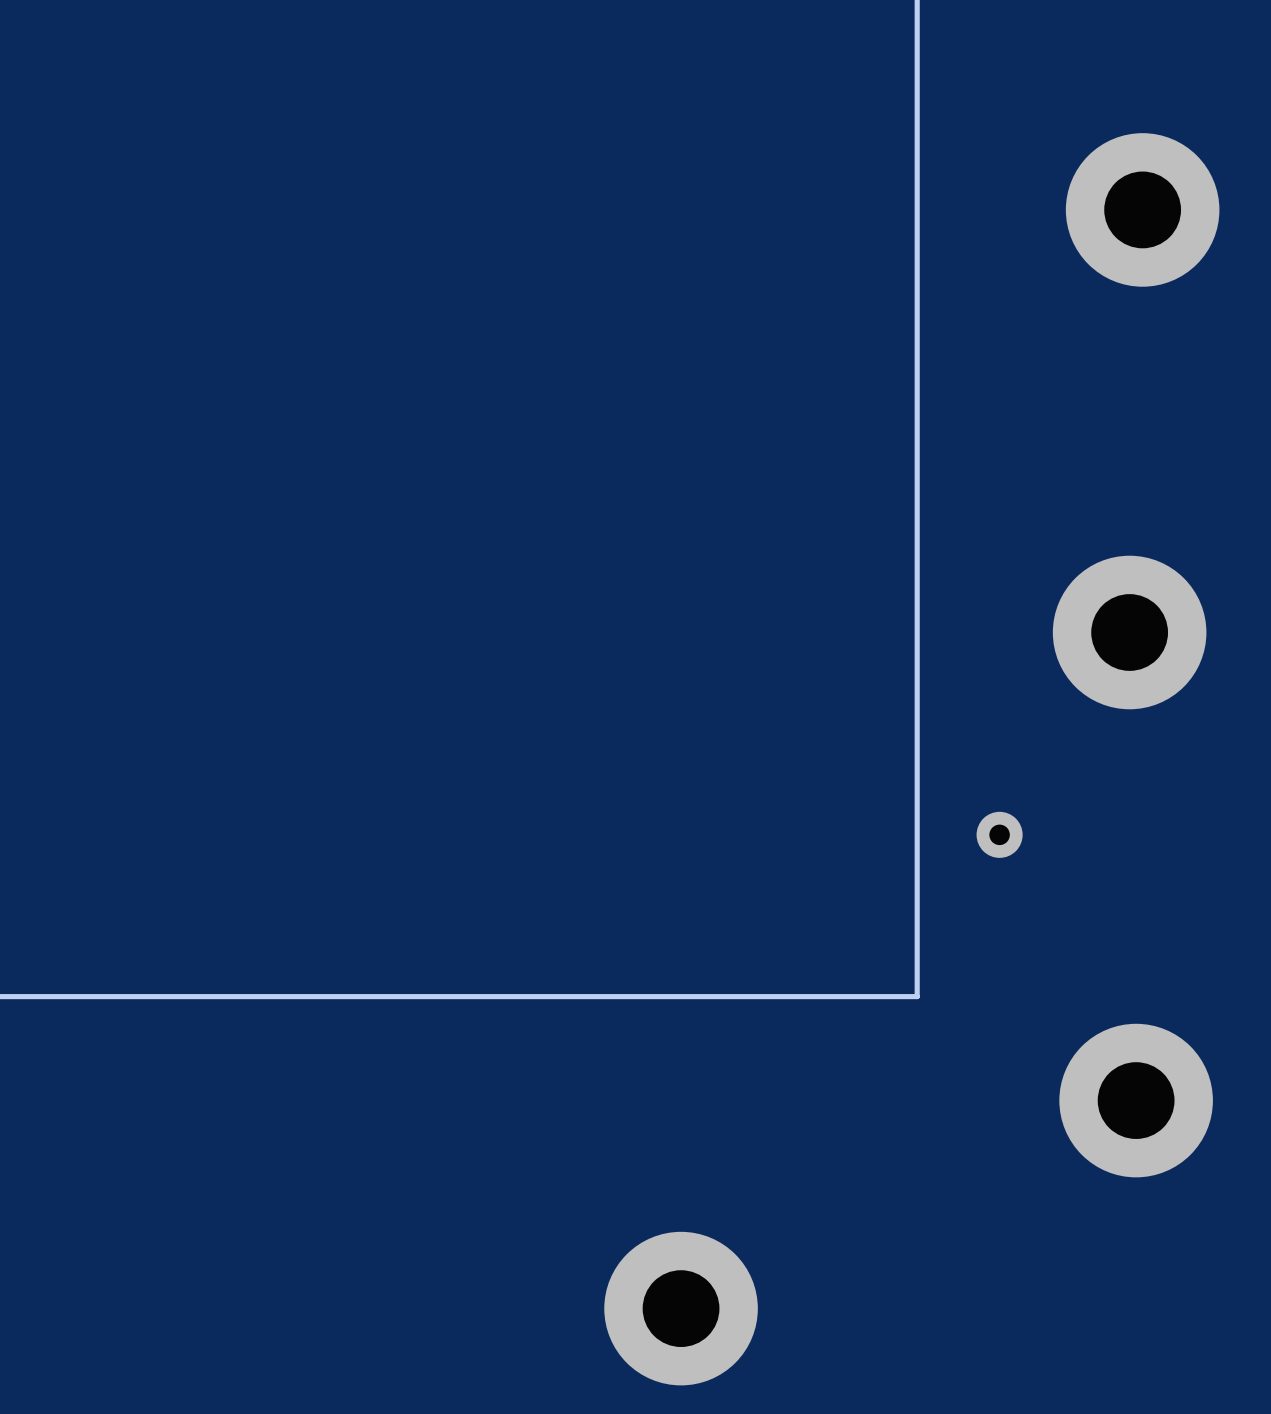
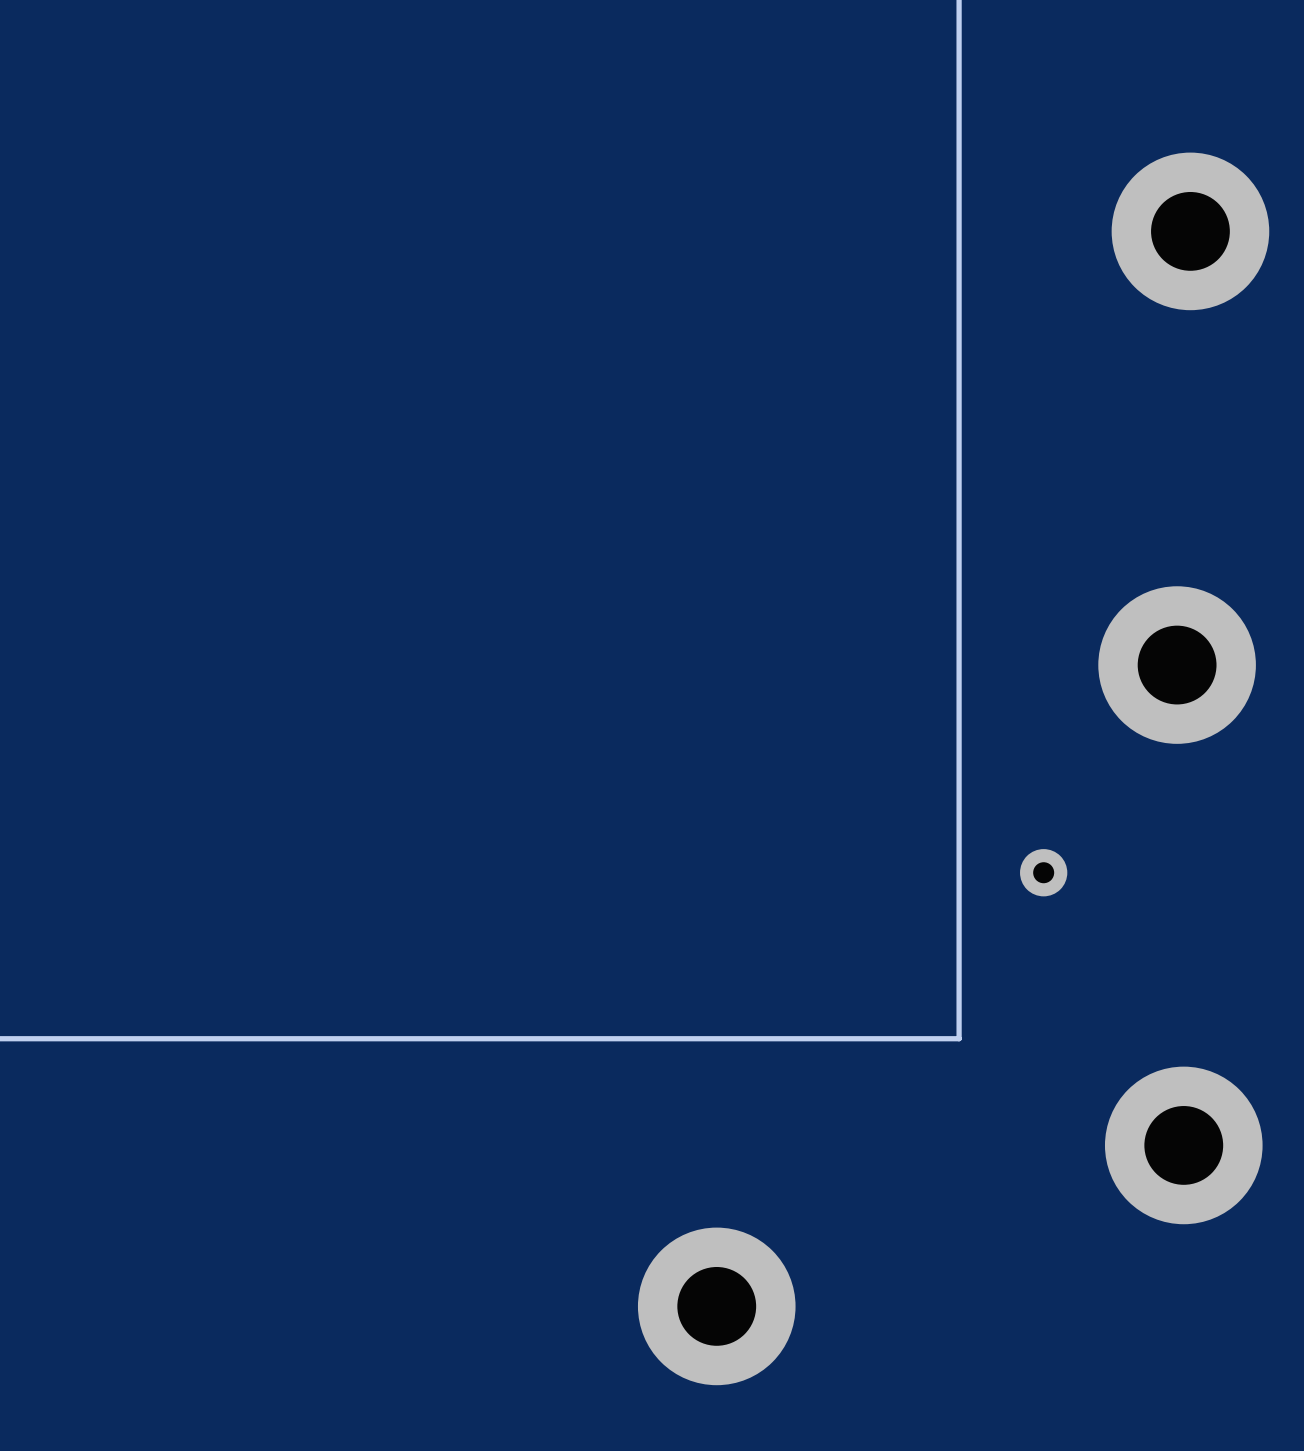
via position: (681, 1308) -> (716, 1306)

